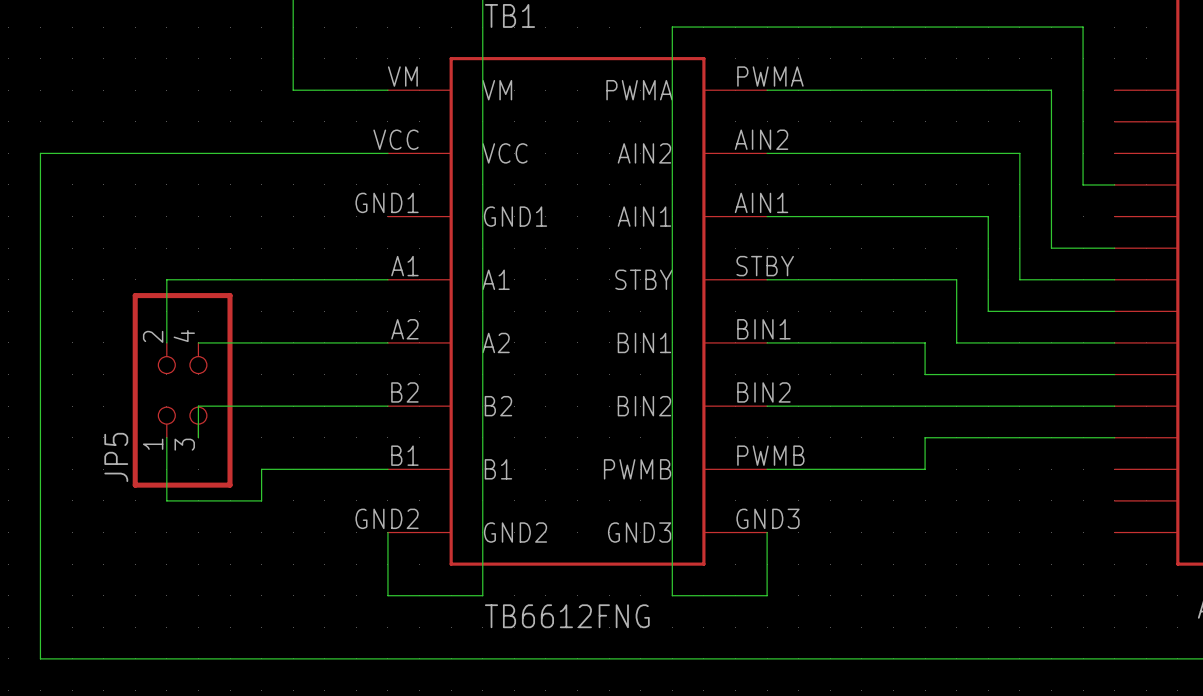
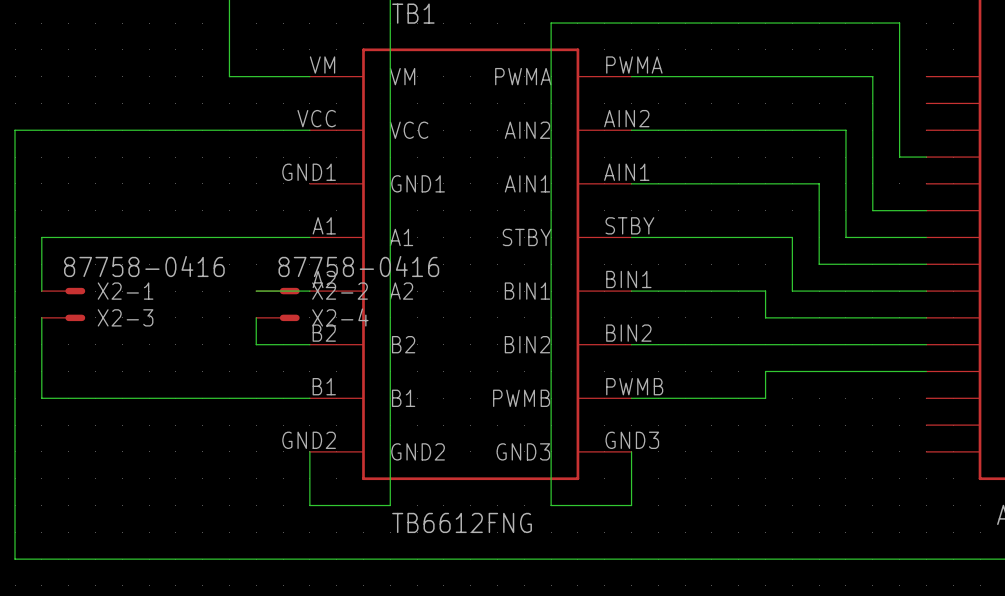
wire: (166, 279) (166, 342) -> (122, 237) (41, 237) (41, 291)
X2-1: none -> 87758-0416 (63, 291)
wire: (198, 342) (324, 342) -> none
X2-2: none -> 87758-0416 (277, 291)
X2-3: none -> (63, 317)
X2-4: none -> (277, 317)
JP5: (182, 390) -> none
wire: (324, 406) (198, 406) (198, 437) -> (256, 344) (256, 317)
wire: (166, 437) (166, 500) (261, 500) (261, 469) -> (41, 317) (41, 398) (202, 398)

